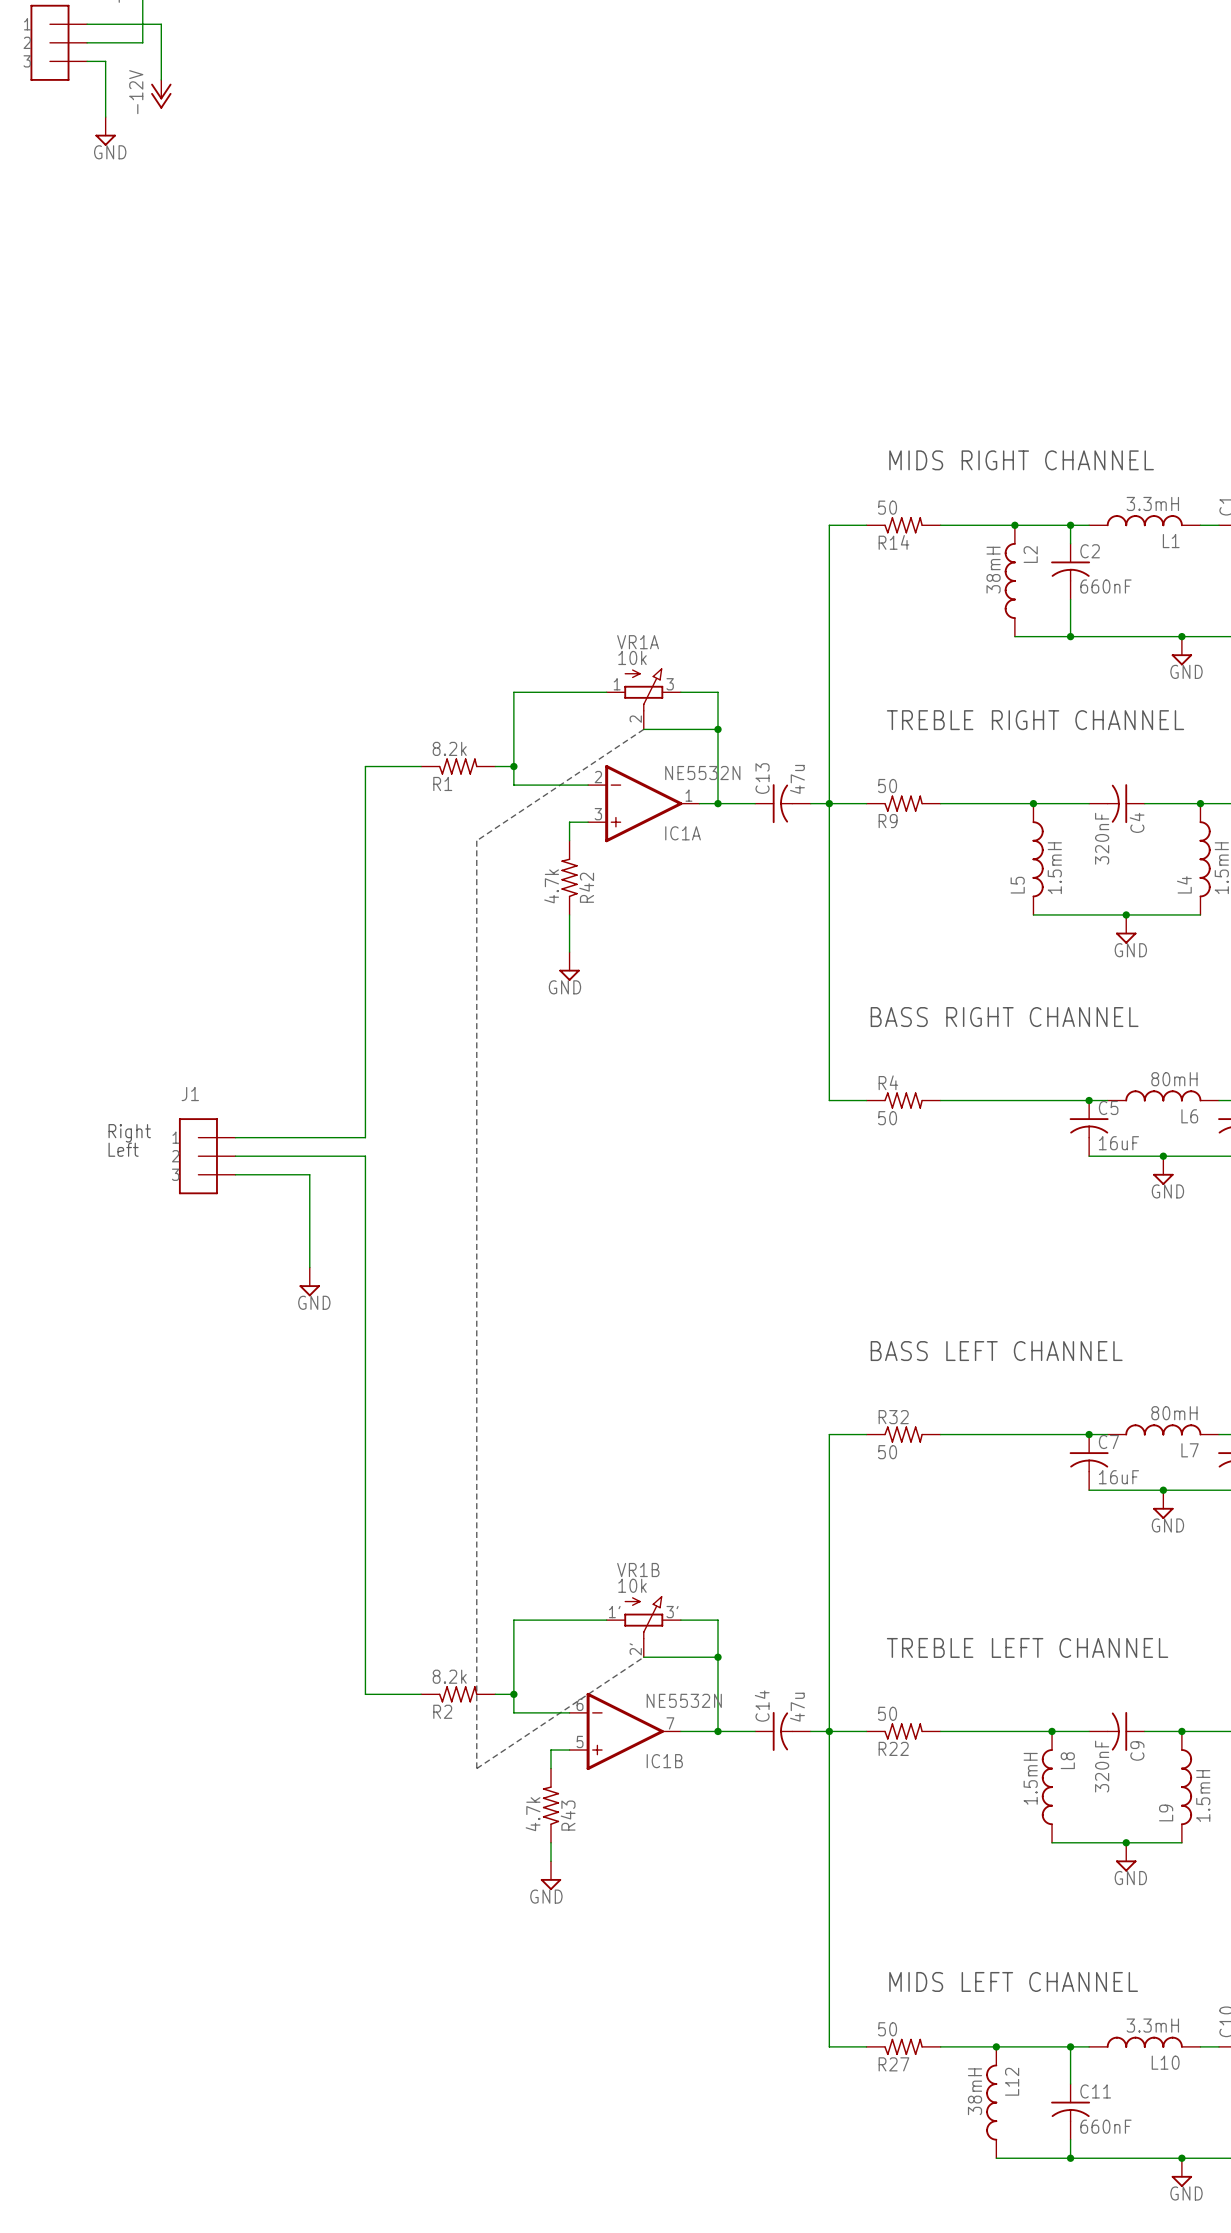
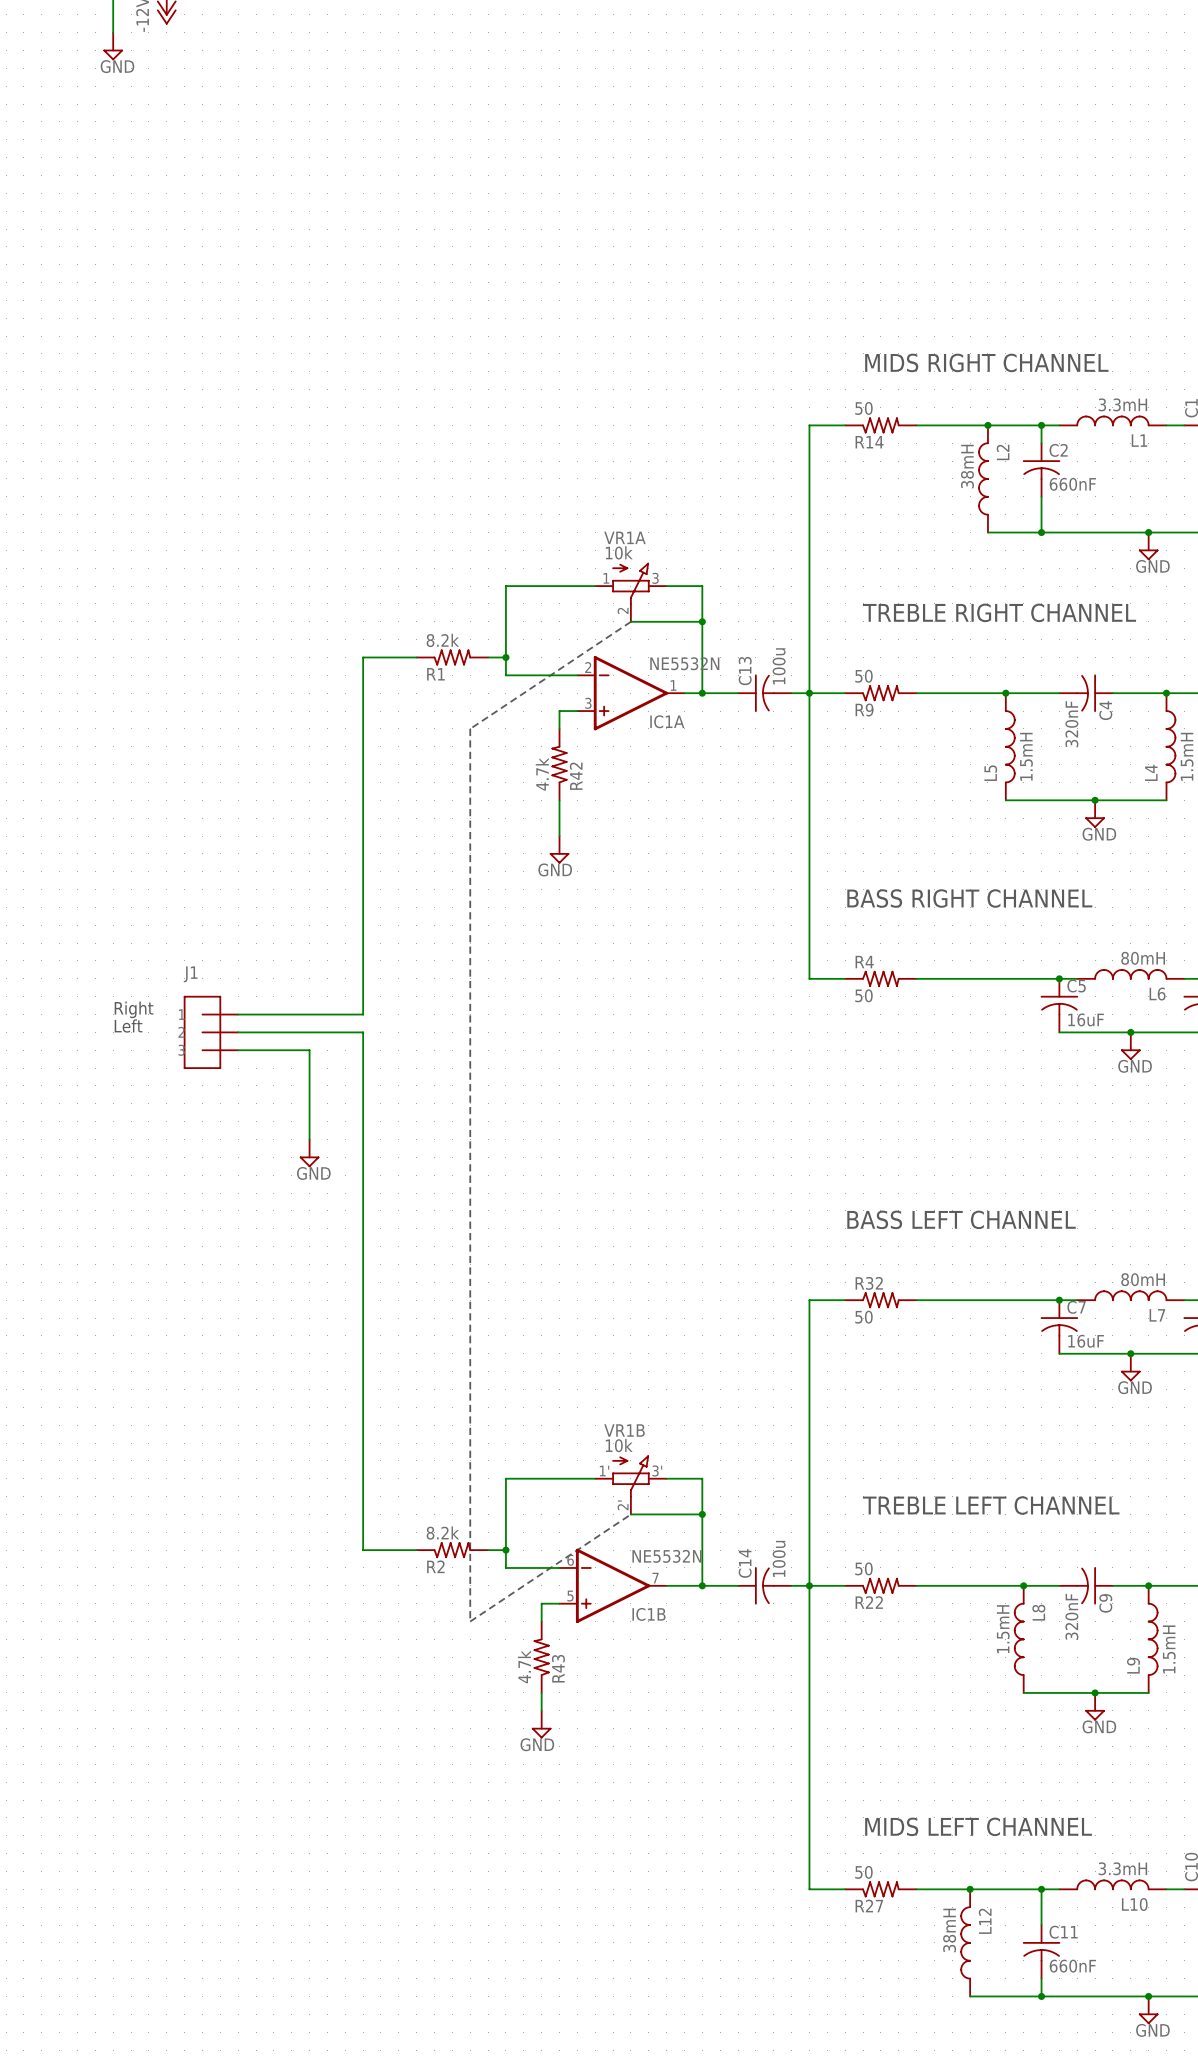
C13 value: 47u (797, 779) -> 100u (779, 666)
C14 value: 47u (797, 1707) -> 100u (779, 1558)

